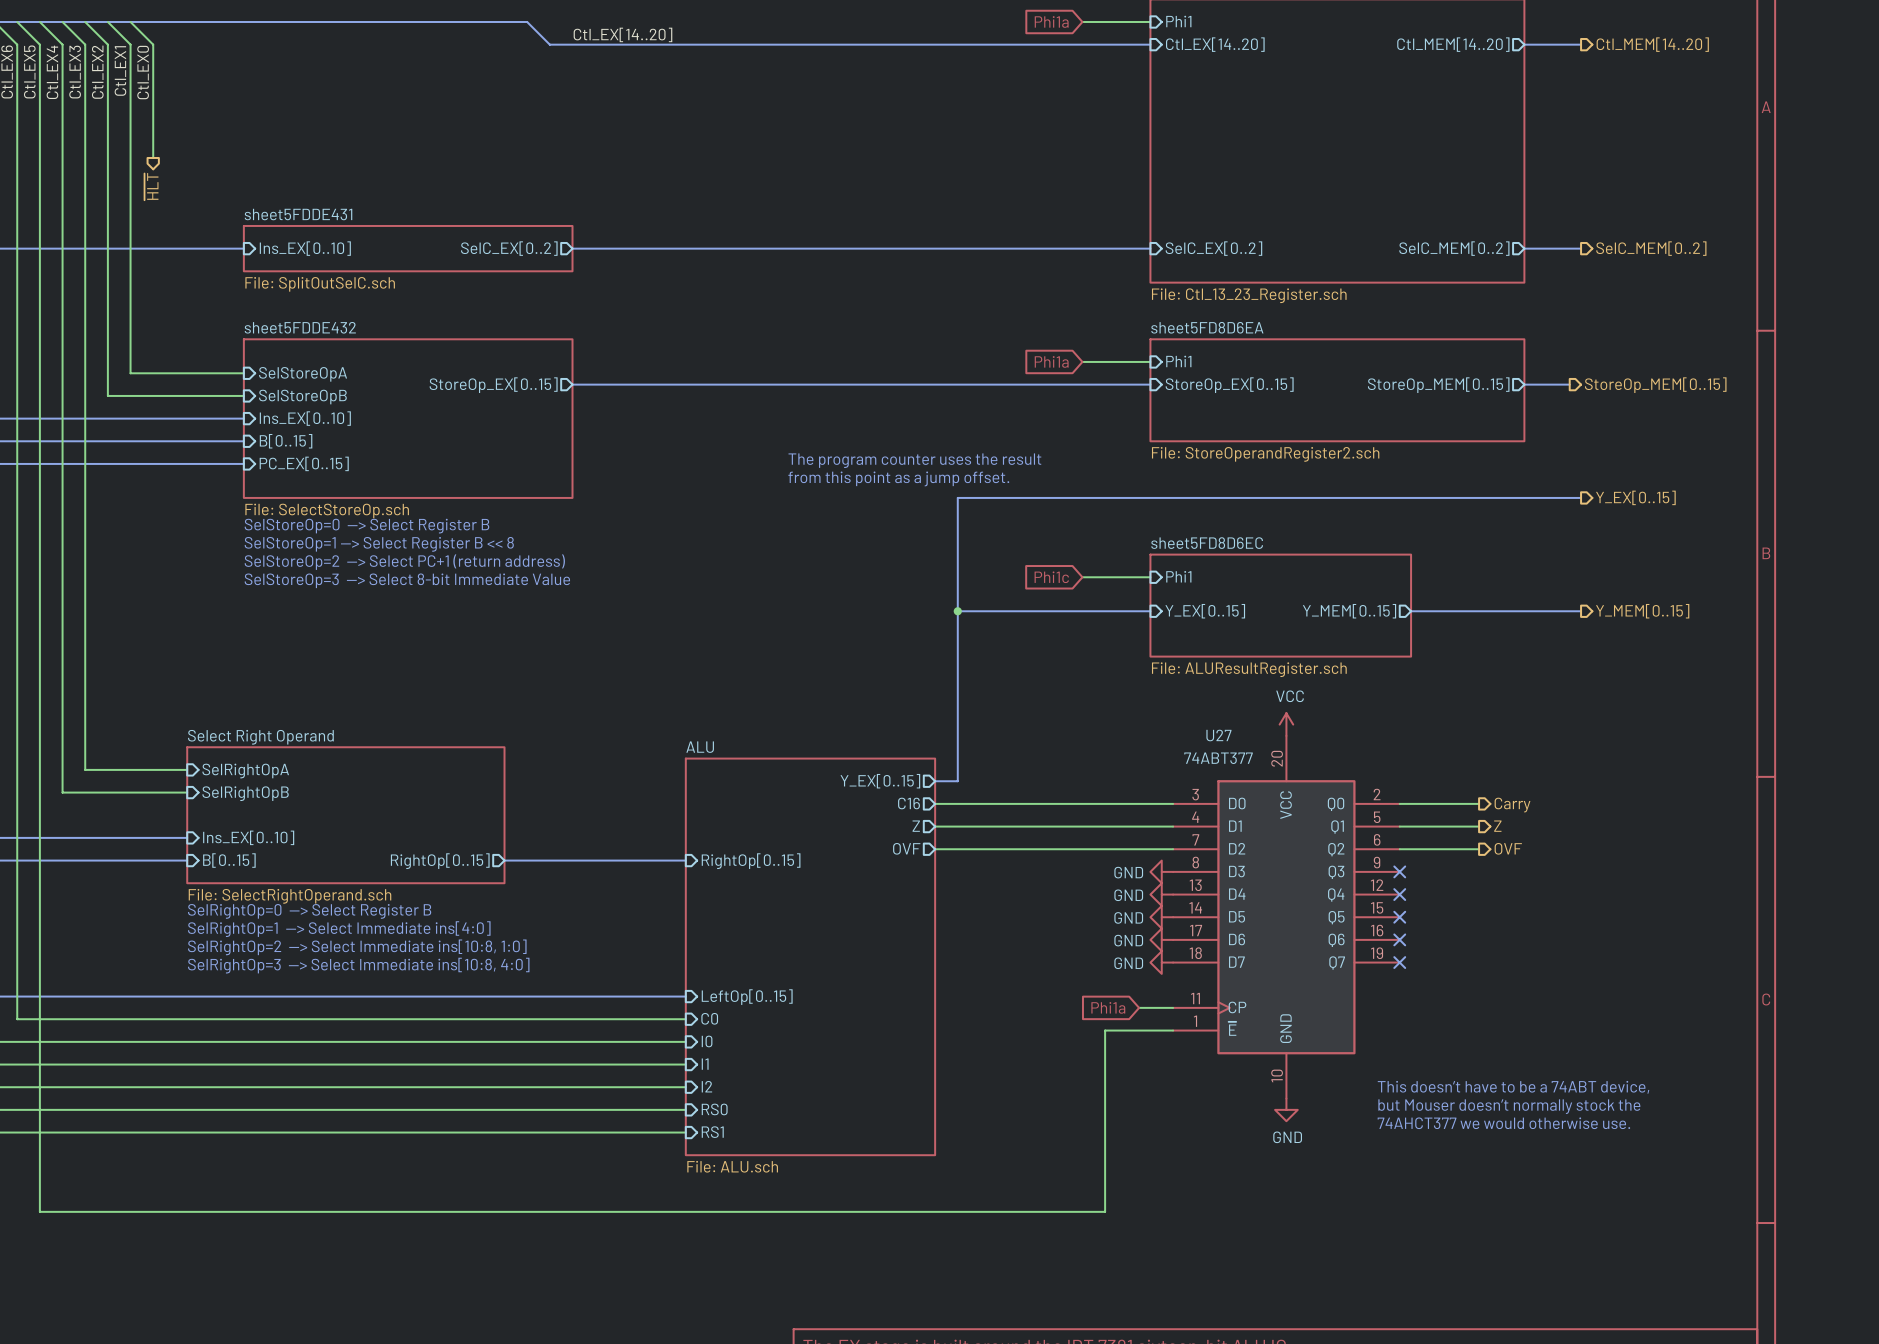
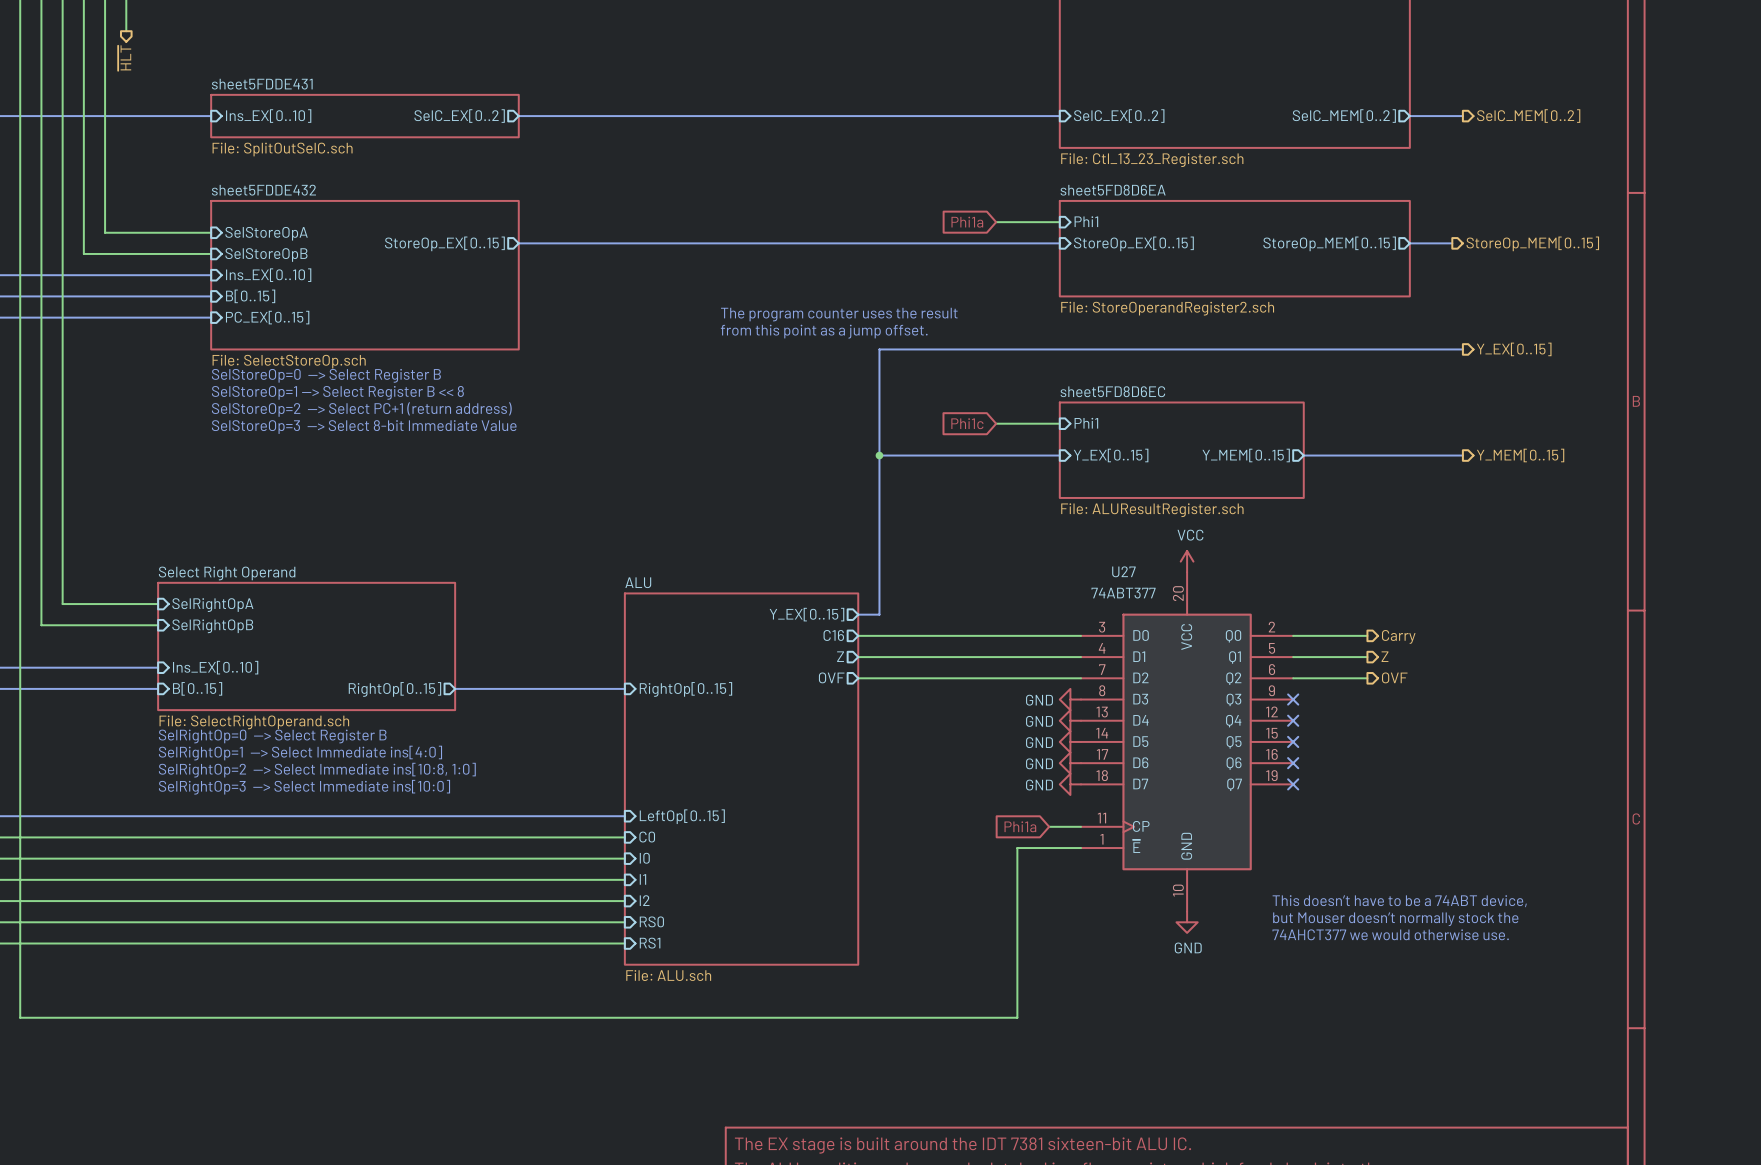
text: SelRightOp=3 —> Select Immediate ins[10:8, 4:0] (358, 965) -> SelRightOp=3 —> Select Immediate ins[10:0] (304, 787)

